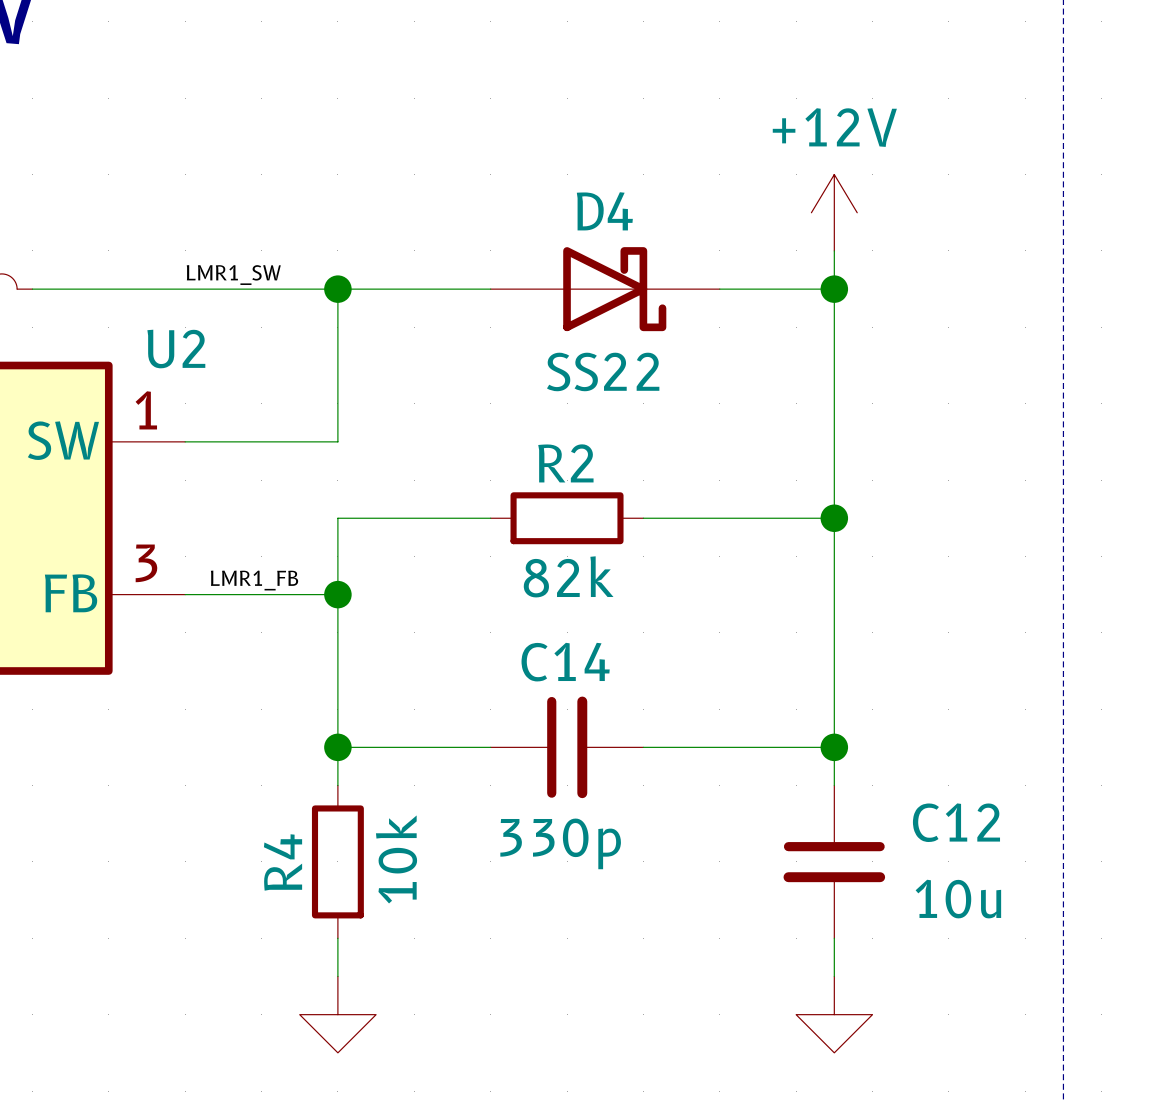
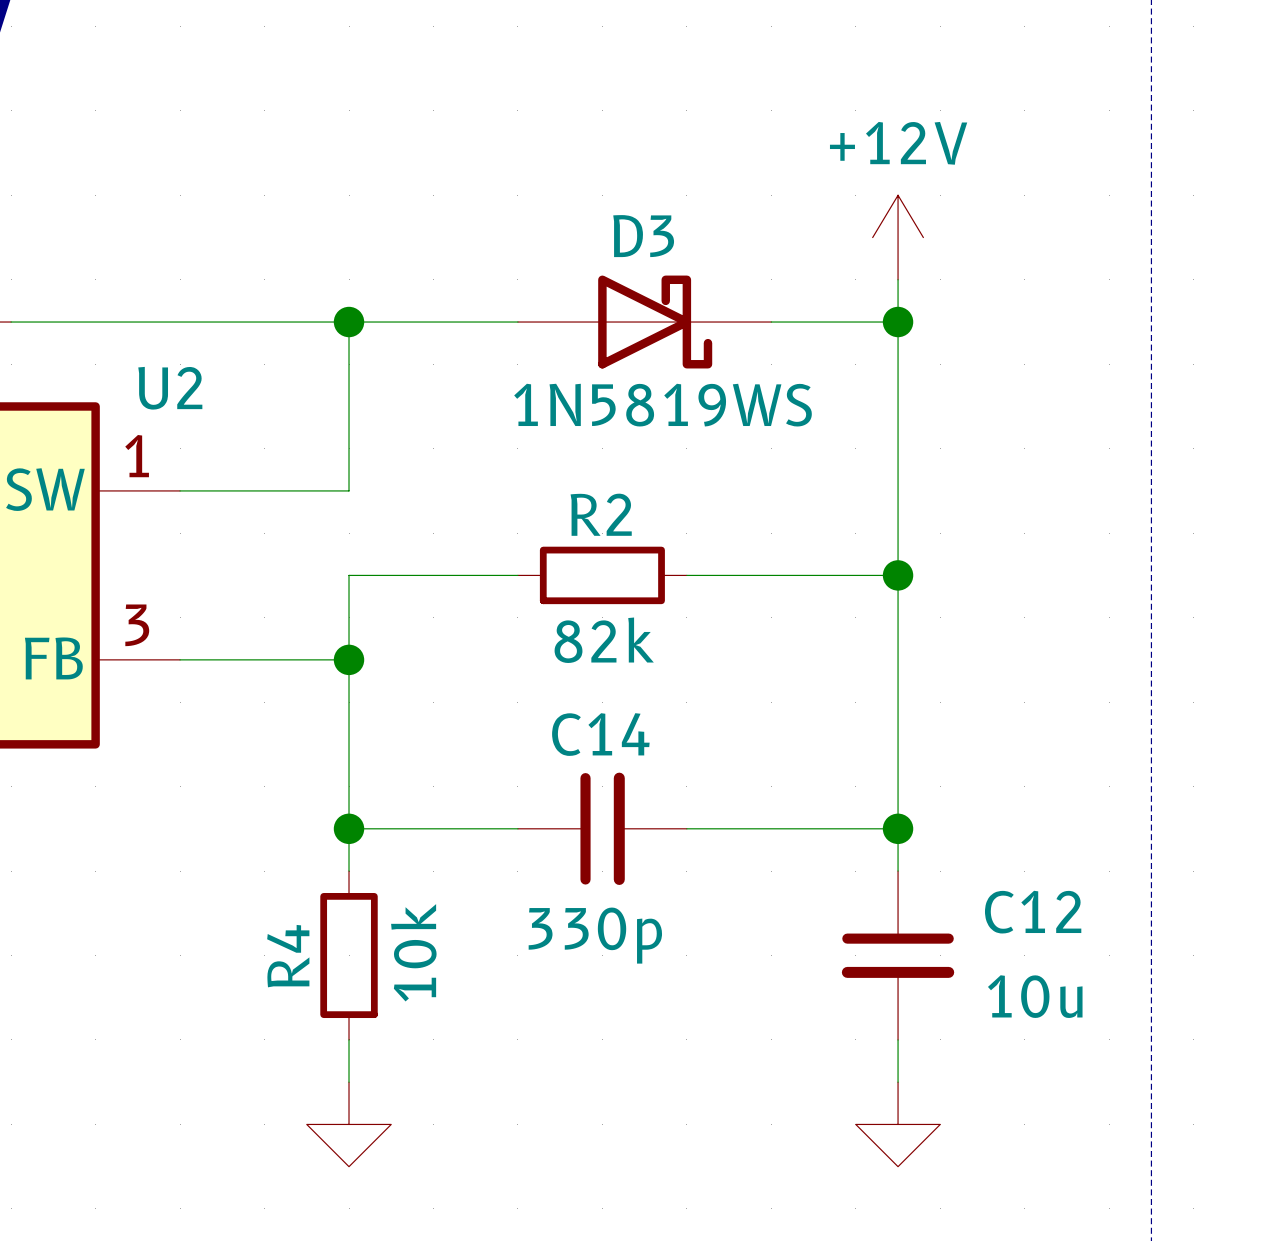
D4 name: D4 (604, 211) -> D3 (643, 236)
label: LMR1_SW (233, 275) -> none
D4 value: SS22 (603, 371) -> 1N5819WS (663, 405)
label: LMR1_FB (254, 580) -> none

